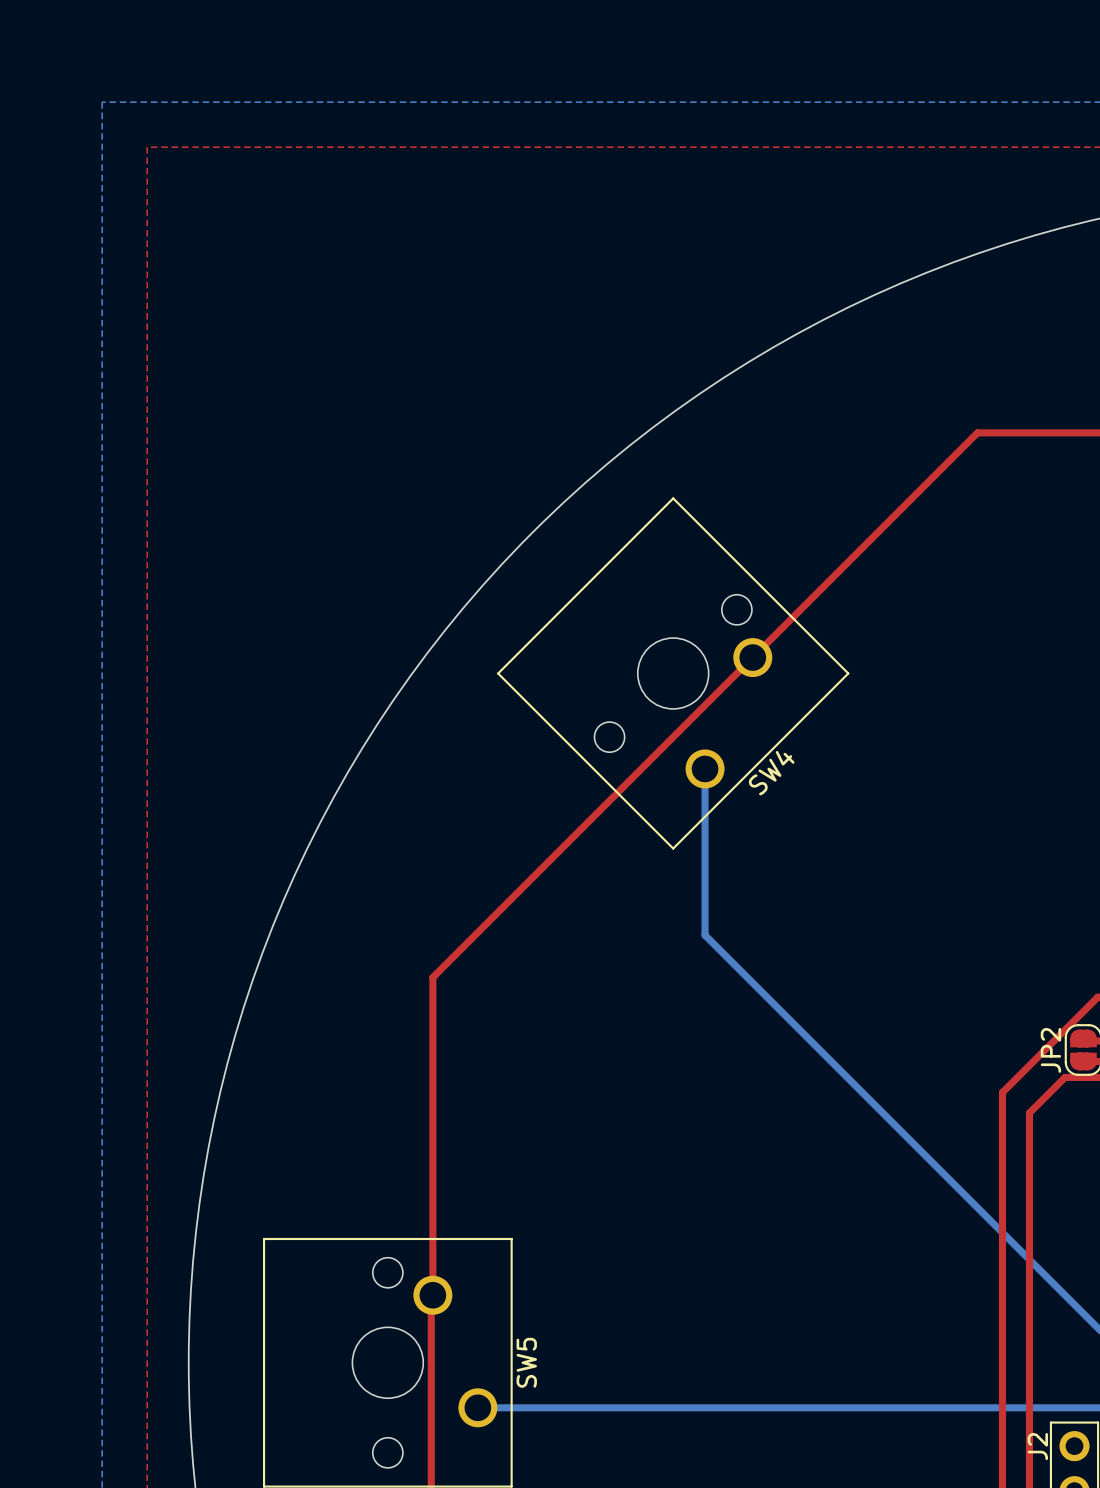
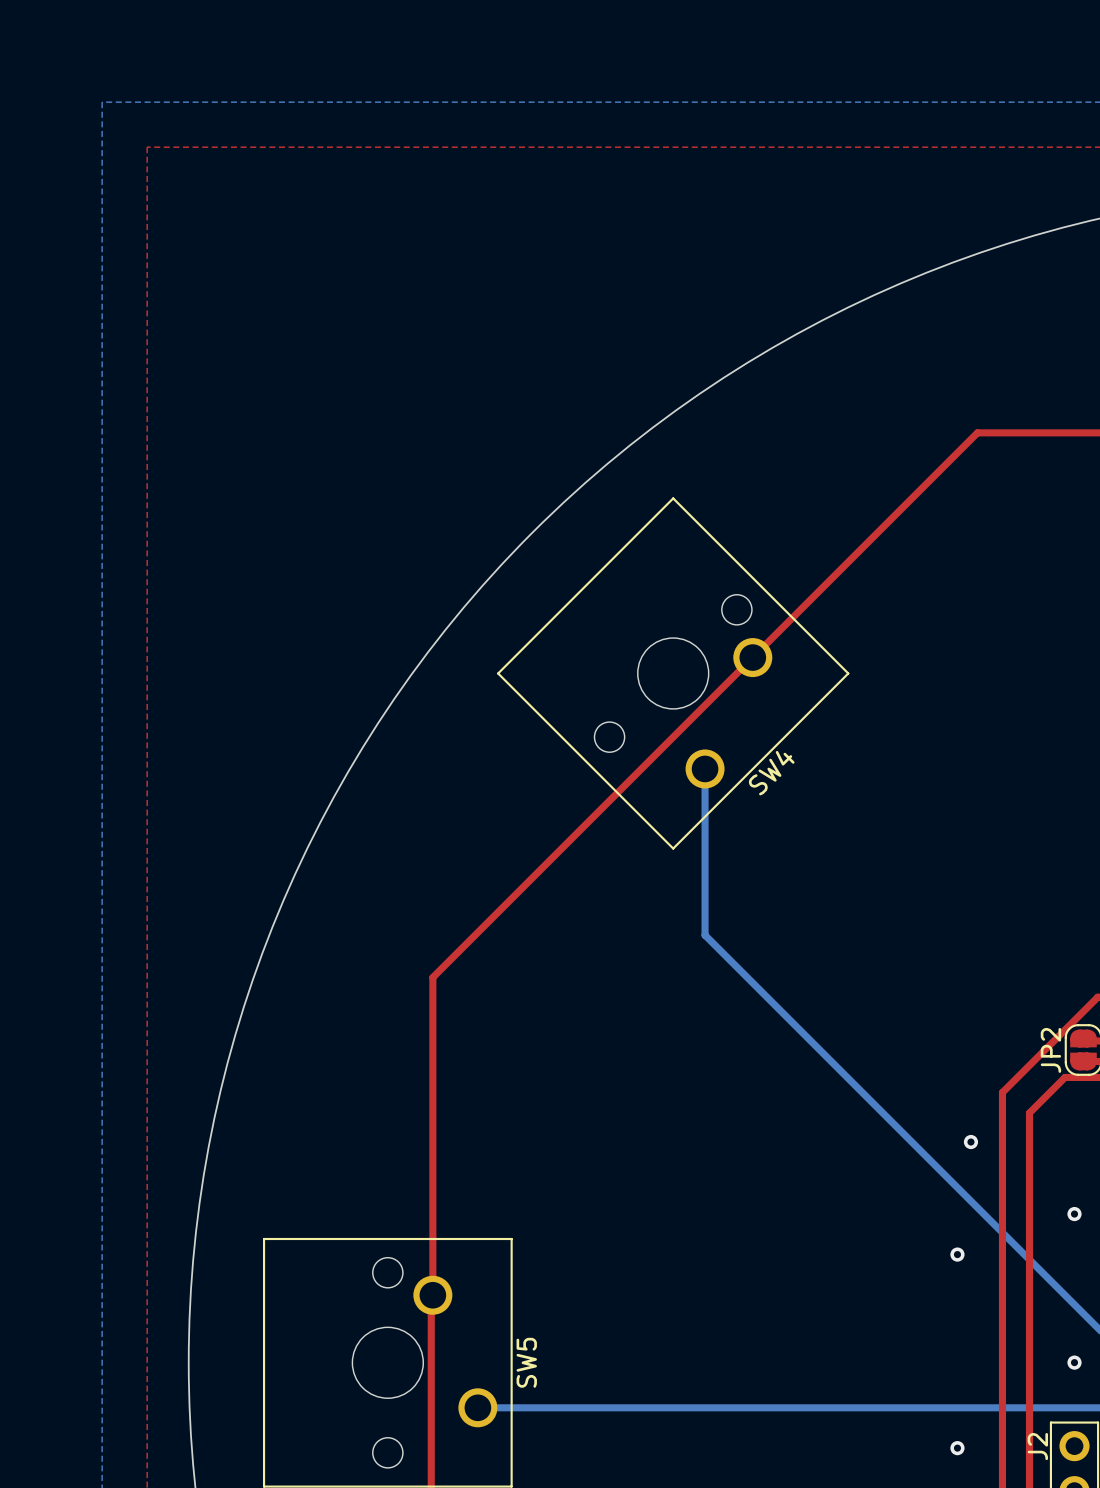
via: none -> (970, 1142)
via: none -> (1074, 1214)
via: none -> (957, 1254)
via: none -> (1074, 1362)
via: none -> (957, 1448)

